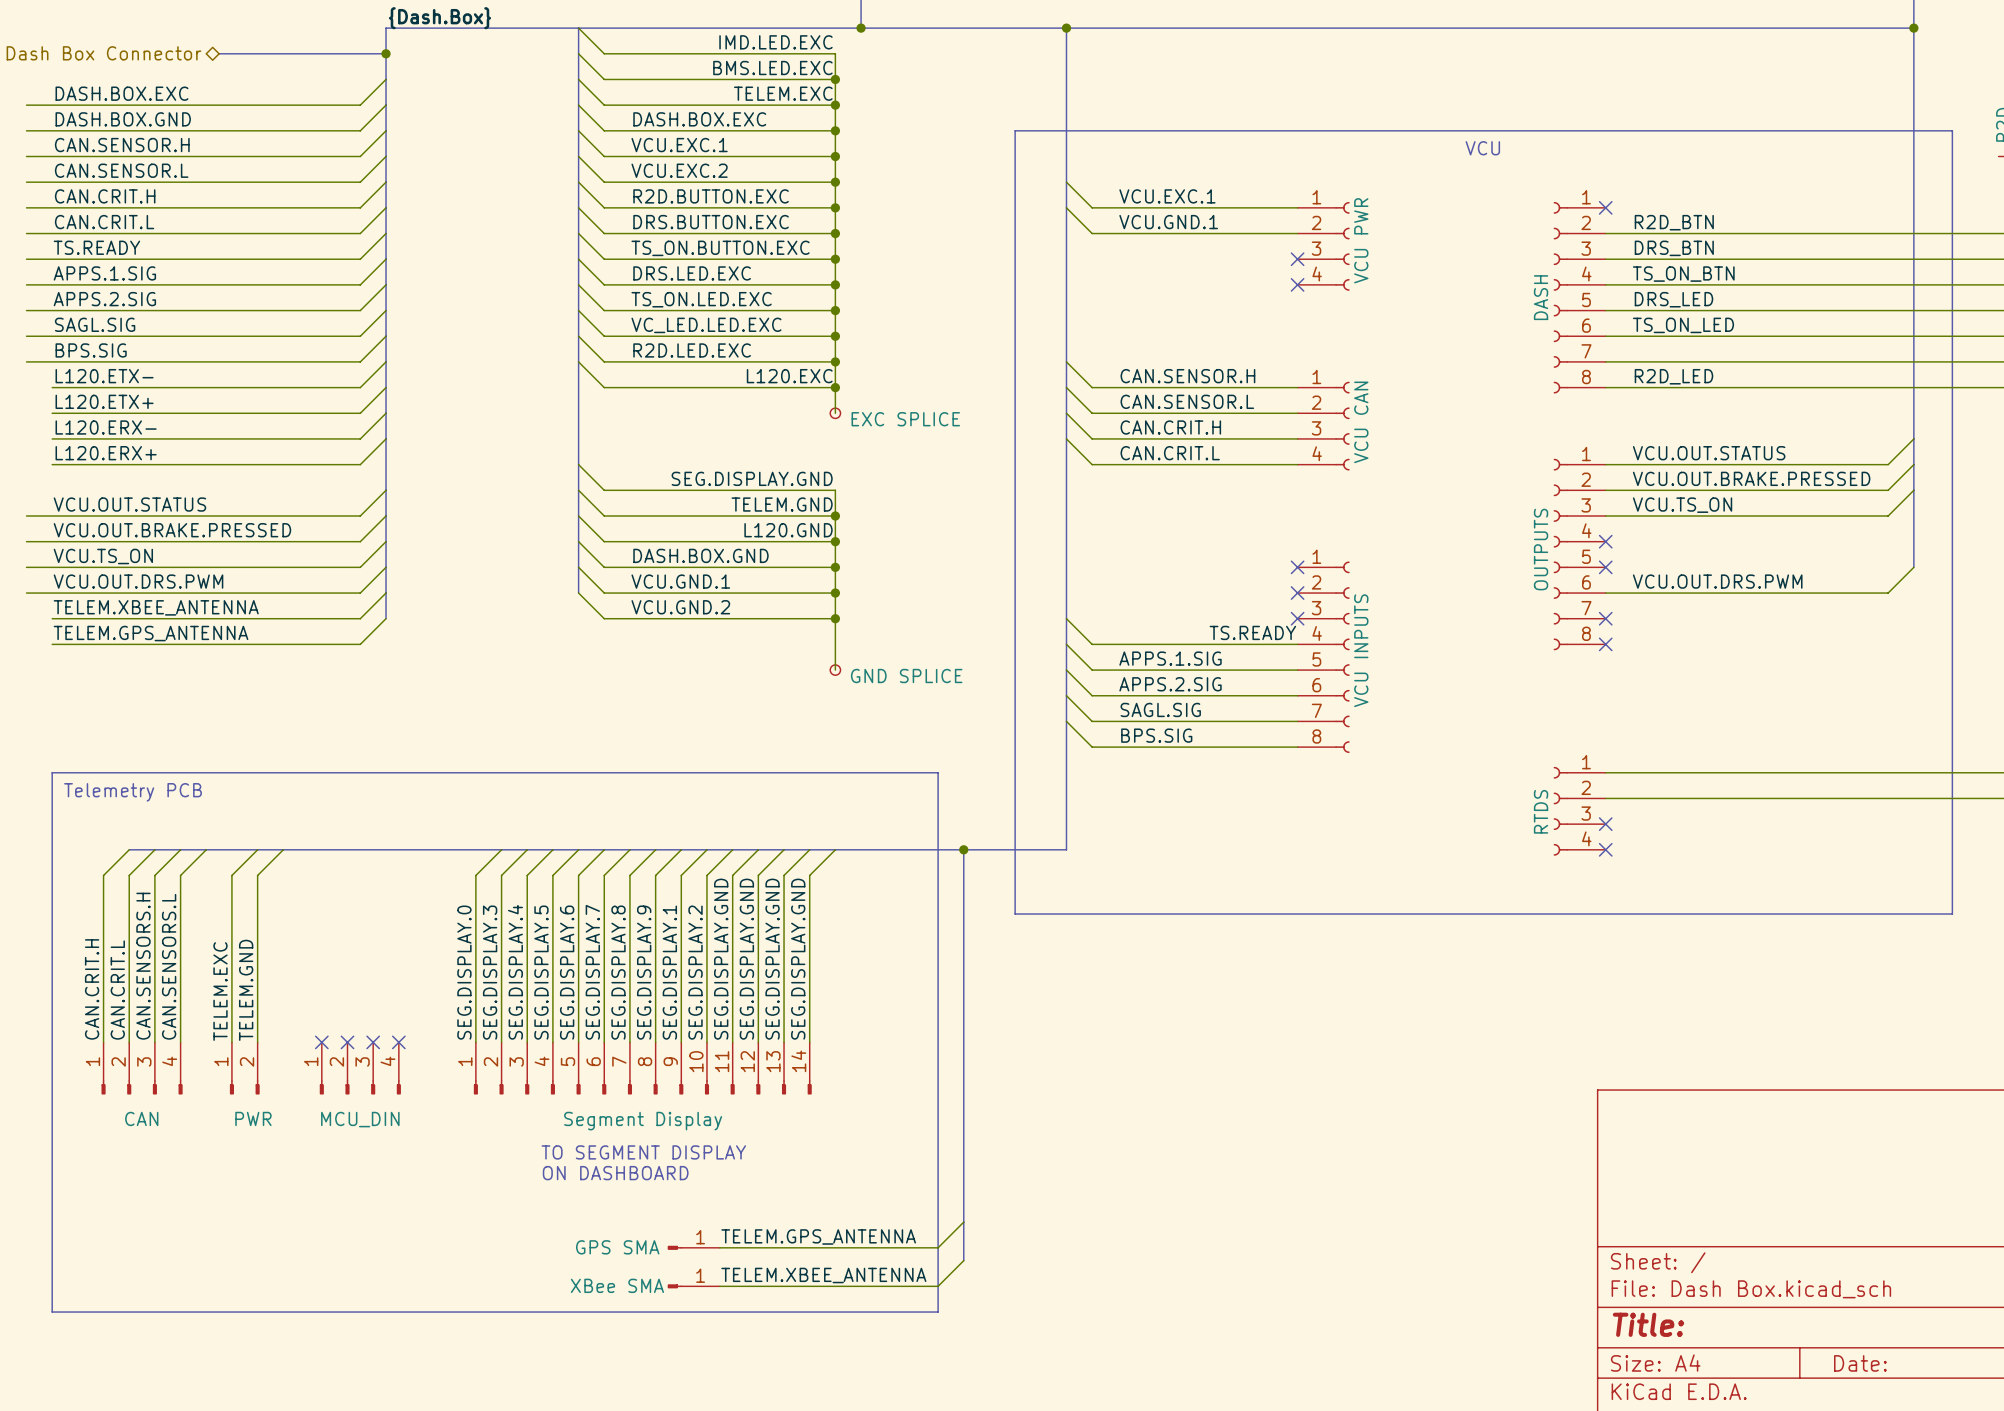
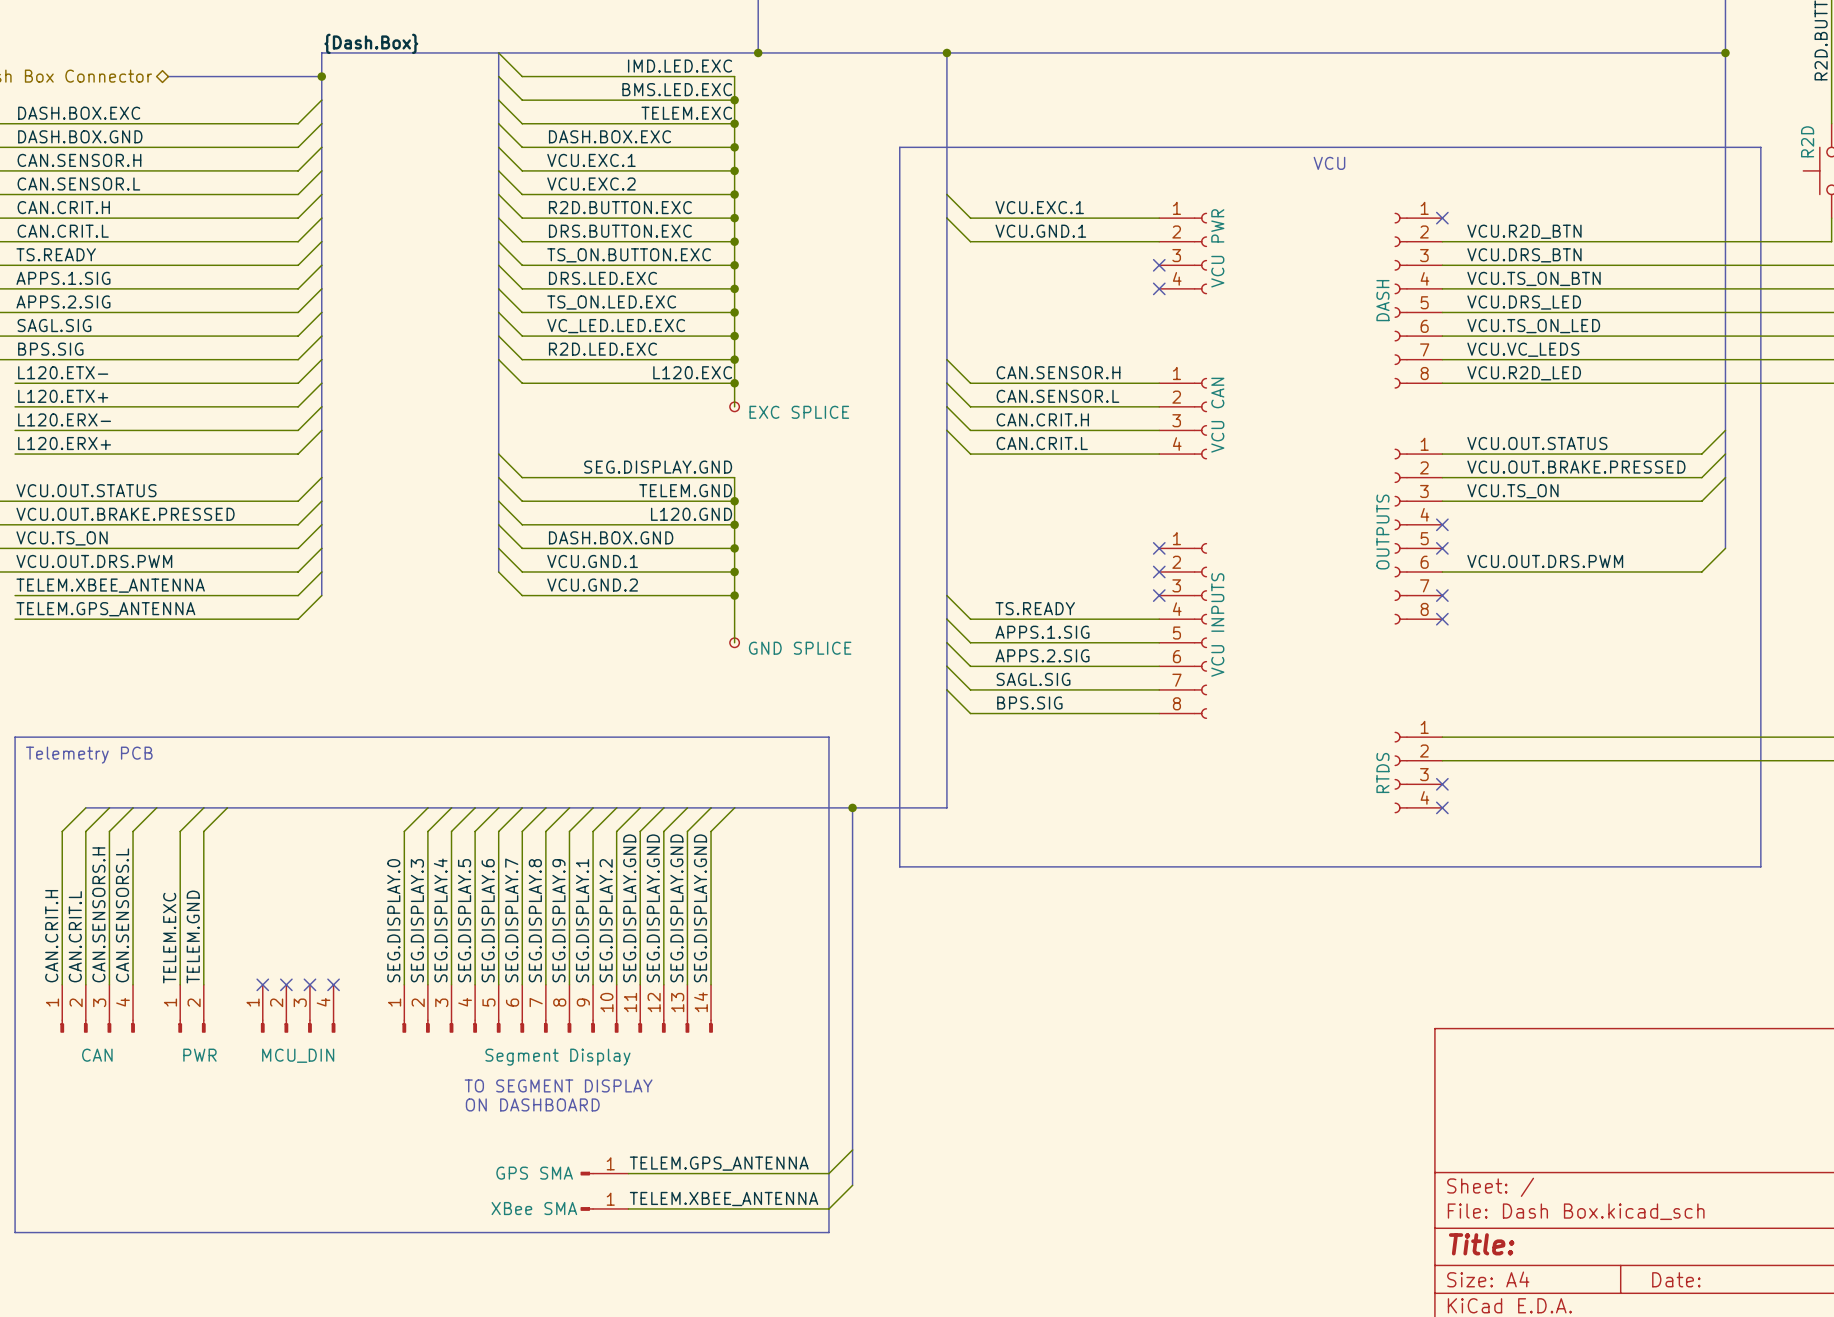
label: R2D_BTN (1674, 222) -> VCU.R2D_BTN (1524, 231)
label: DRS_BTN (1674, 248) -> VCU.DRS_BTN (1524, 255)
label: TS_ON_BTN (1683, 274) -> VCU.TS_ON_BTN (1534, 278)
label: DRS_LED (1673, 299) -> VCU.DRS_LED (1524, 302)
label: TS_ON_LED (1683, 325) -> VCU.TS_ON_LED (1533, 326)
label: none -> VCU.VC_LEDS (1523, 349)
label: R2D_LED (1673, 376) -> VCU.R2D_LED (1524, 373)
label position: TS.READY (1252, 632) -> TS.READY (1035, 608)

